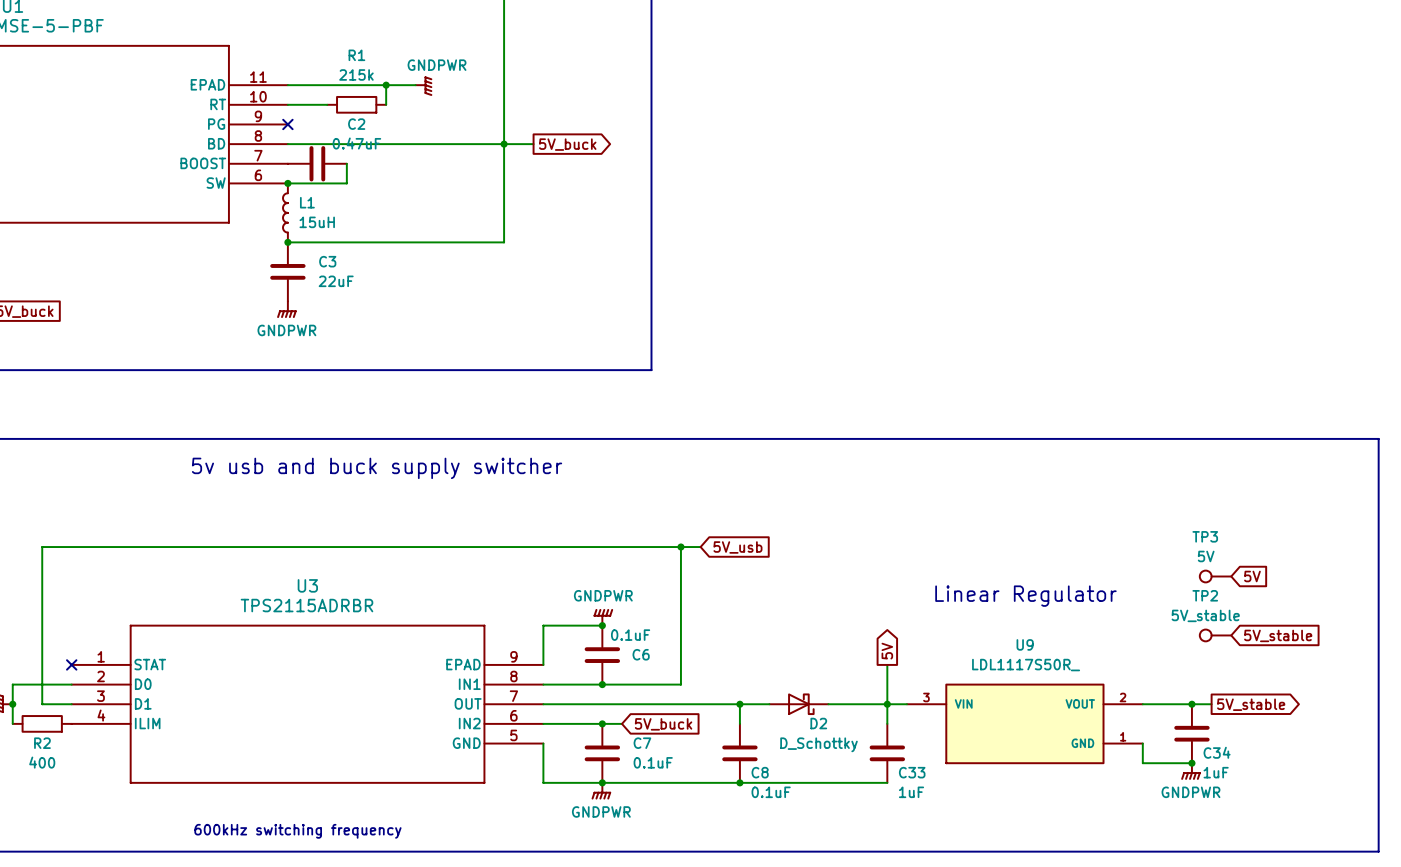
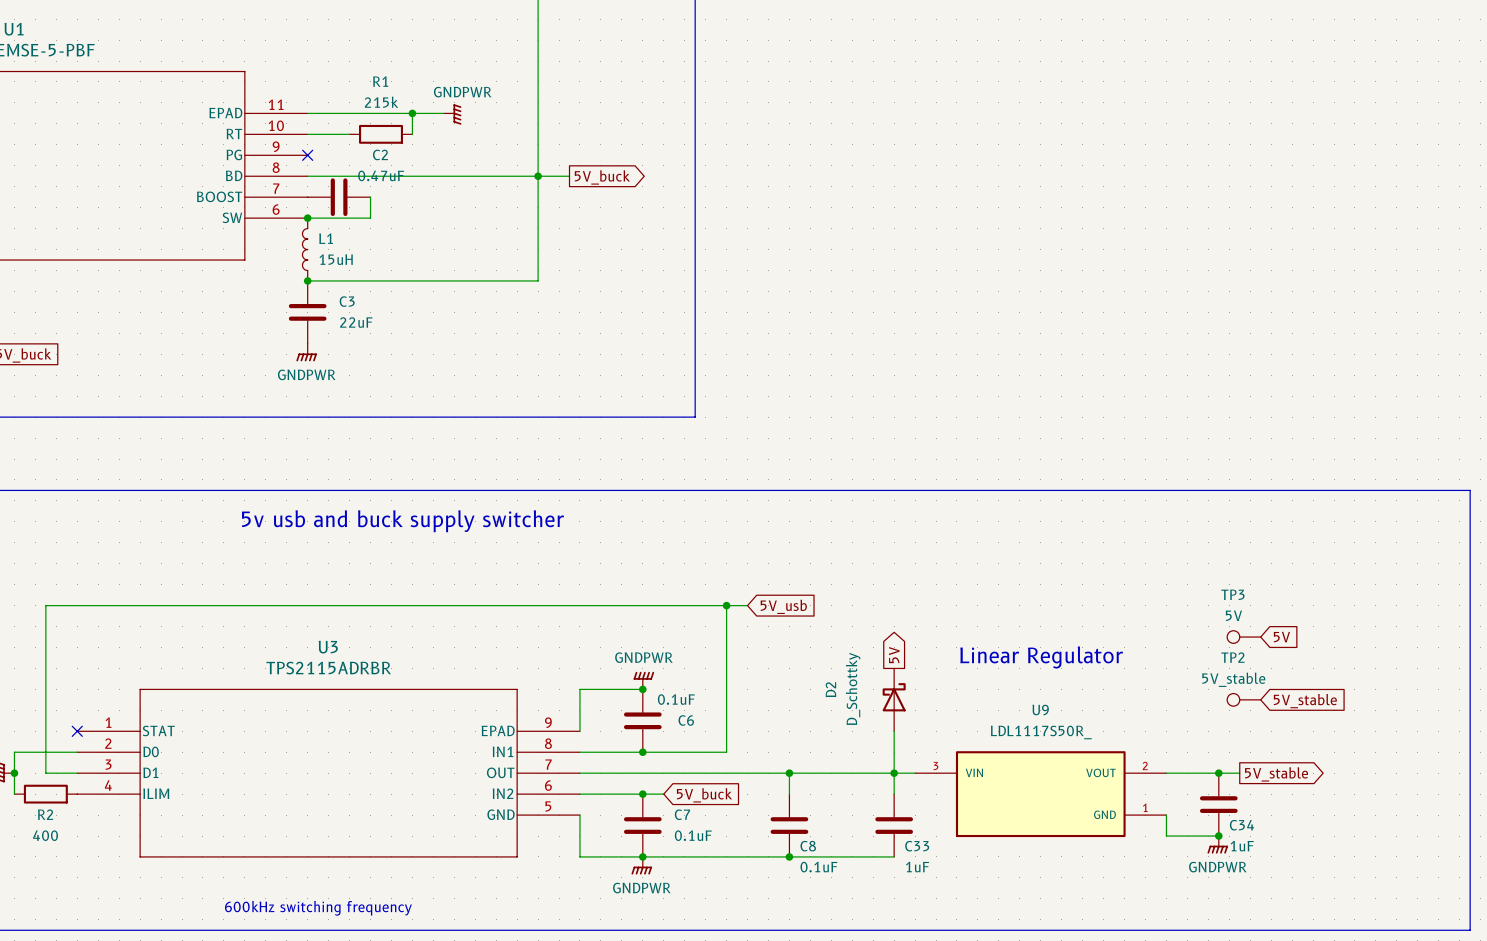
TP3 position: (1215, 576) -> (1243, 637)
global label position: 5V (1252, 576) -> 5V (1281, 637)
text position: Linear Regulator (1025, 596) -> Linear Regulator (1041, 657)
TP2 position: (1215, 635) -> (1243, 699)
global label position: 5V_stable (1278, 635) -> 5V_stable (1305, 701)
global label position: 5V (887, 651) -> 5V (894, 655)
wire: (887, 664) (887, 723) -> (894, 731) (894, 794)
D2 position: (798, 704) -> (894, 699)
D2 rotation: 0° (801, 704) -> 90° counterclockwise (894, 697)
junction: none -> (894, 773)
junction: (887, 704) -> none
junction: none -> (1218, 773)
junction: (1191, 704) -> none
global label position: 5V_stable (1251, 704) -> 5V_stable (1276, 774)
D2 name position: D2 (818, 723) -> D2 (830, 689)
U9 position: (1024, 723) -> (1040, 794)
C34 position: (1191, 733) -> (1218, 804)
wire: (1142, 743) (1142, 763) (1191, 763) -> (1166, 815) (1166, 836) (1218, 836)
D2 value position: D_Schottky (819, 744) -> D_Schottky (853, 688)
C33 position: (887, 753) -> (894, 825)
junction: none -> (1218, 836)
junction: (1191, 763) -> none
power symbol position: GNDPWR (1190, 771) -> GNDPWR (1217, 844)
wire: (838, 782) (887, 782) -> none

